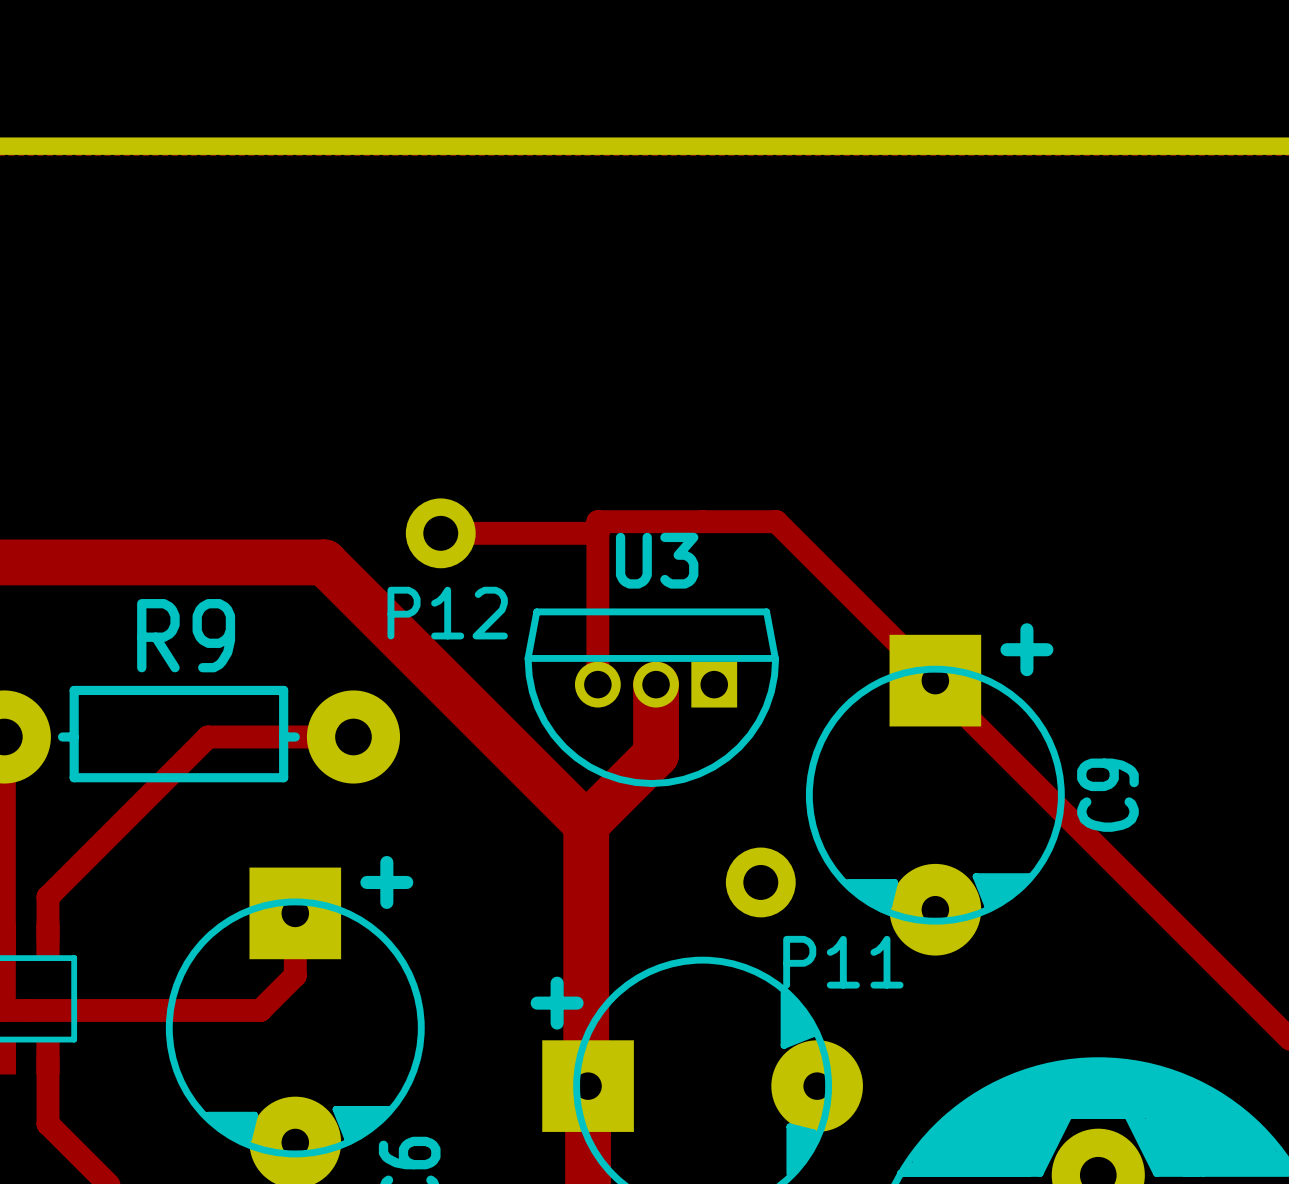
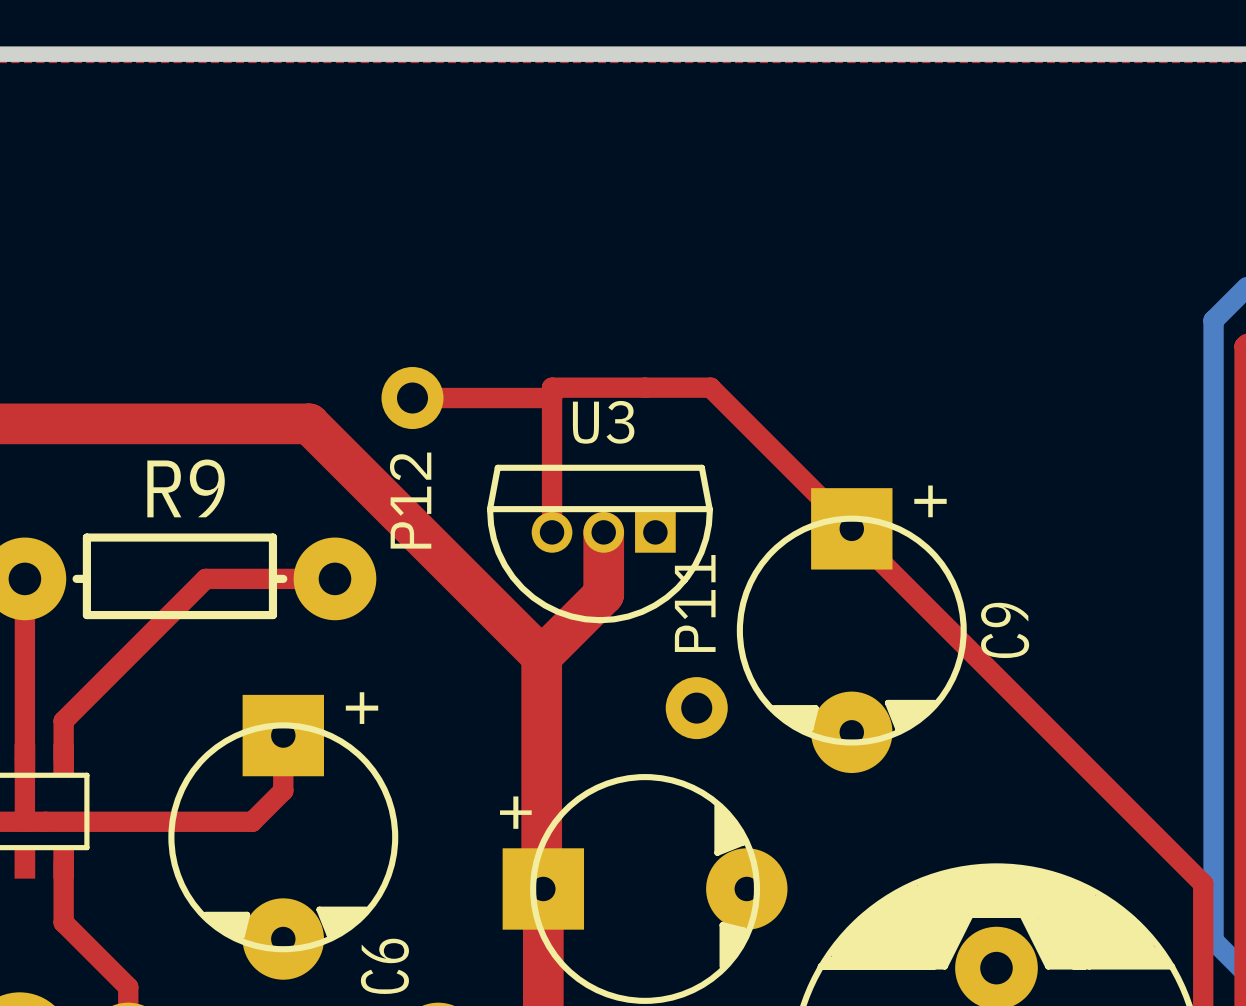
P12 name rotation: 0° (447, 613) -> 90° counterclockwise (410, 500)
P11 name rotation: 0° (843, 962) -> 90° counterclockwise (695, 603)
P11 name position: P11 (843, 962) -> P11 (695, 603)

